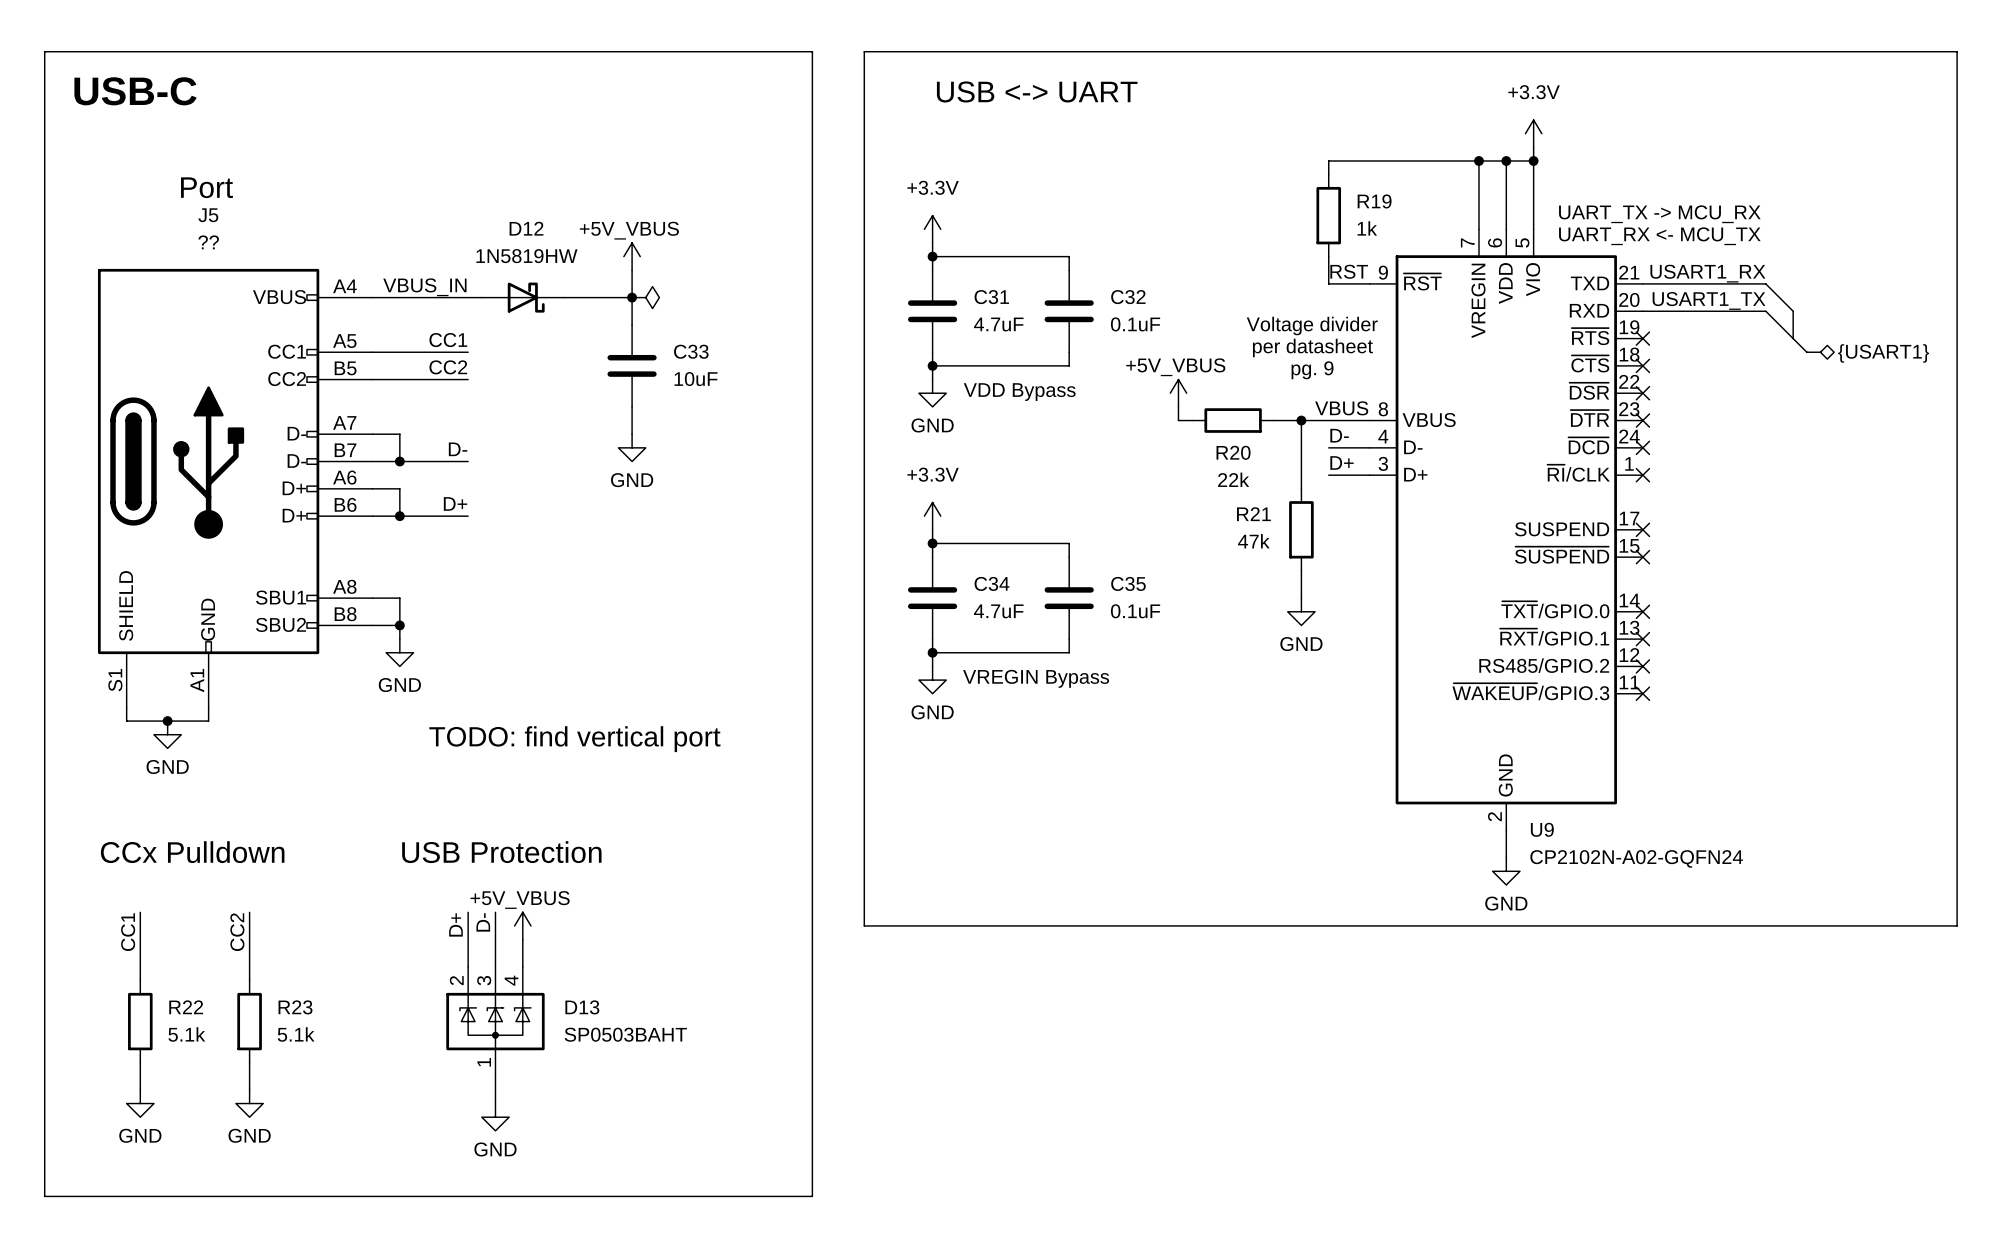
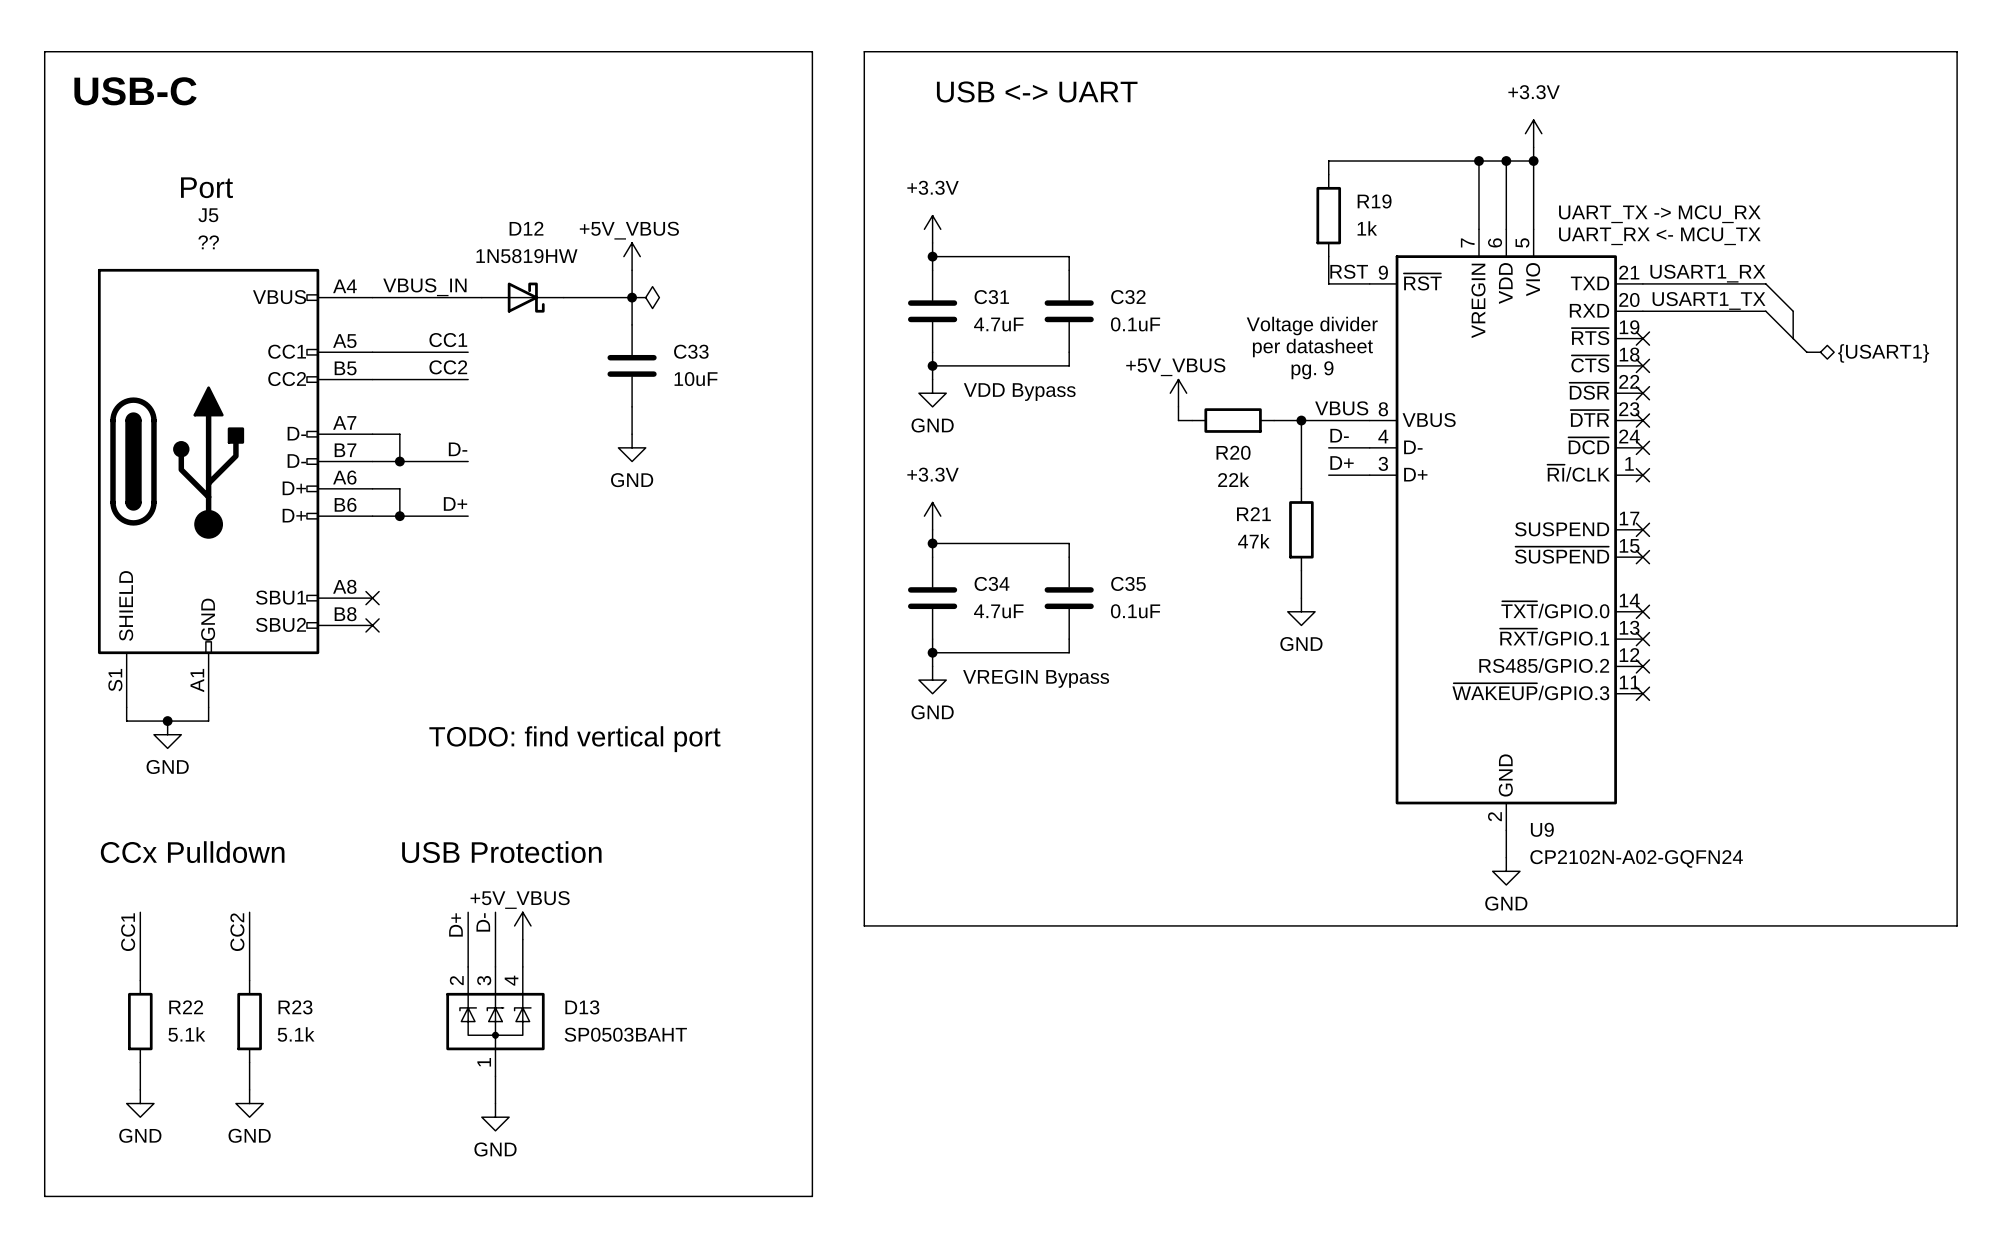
wire: (372, 598) (399, 598) (399, 639) -> none
no-connect mark: none -> (372, 598)
wire: (372, 625) (399, 625) -> none
no-connect mark: none -> (372, 625)
junction: (399, 625) -> none
power symbol: GND (399, 652) -> none

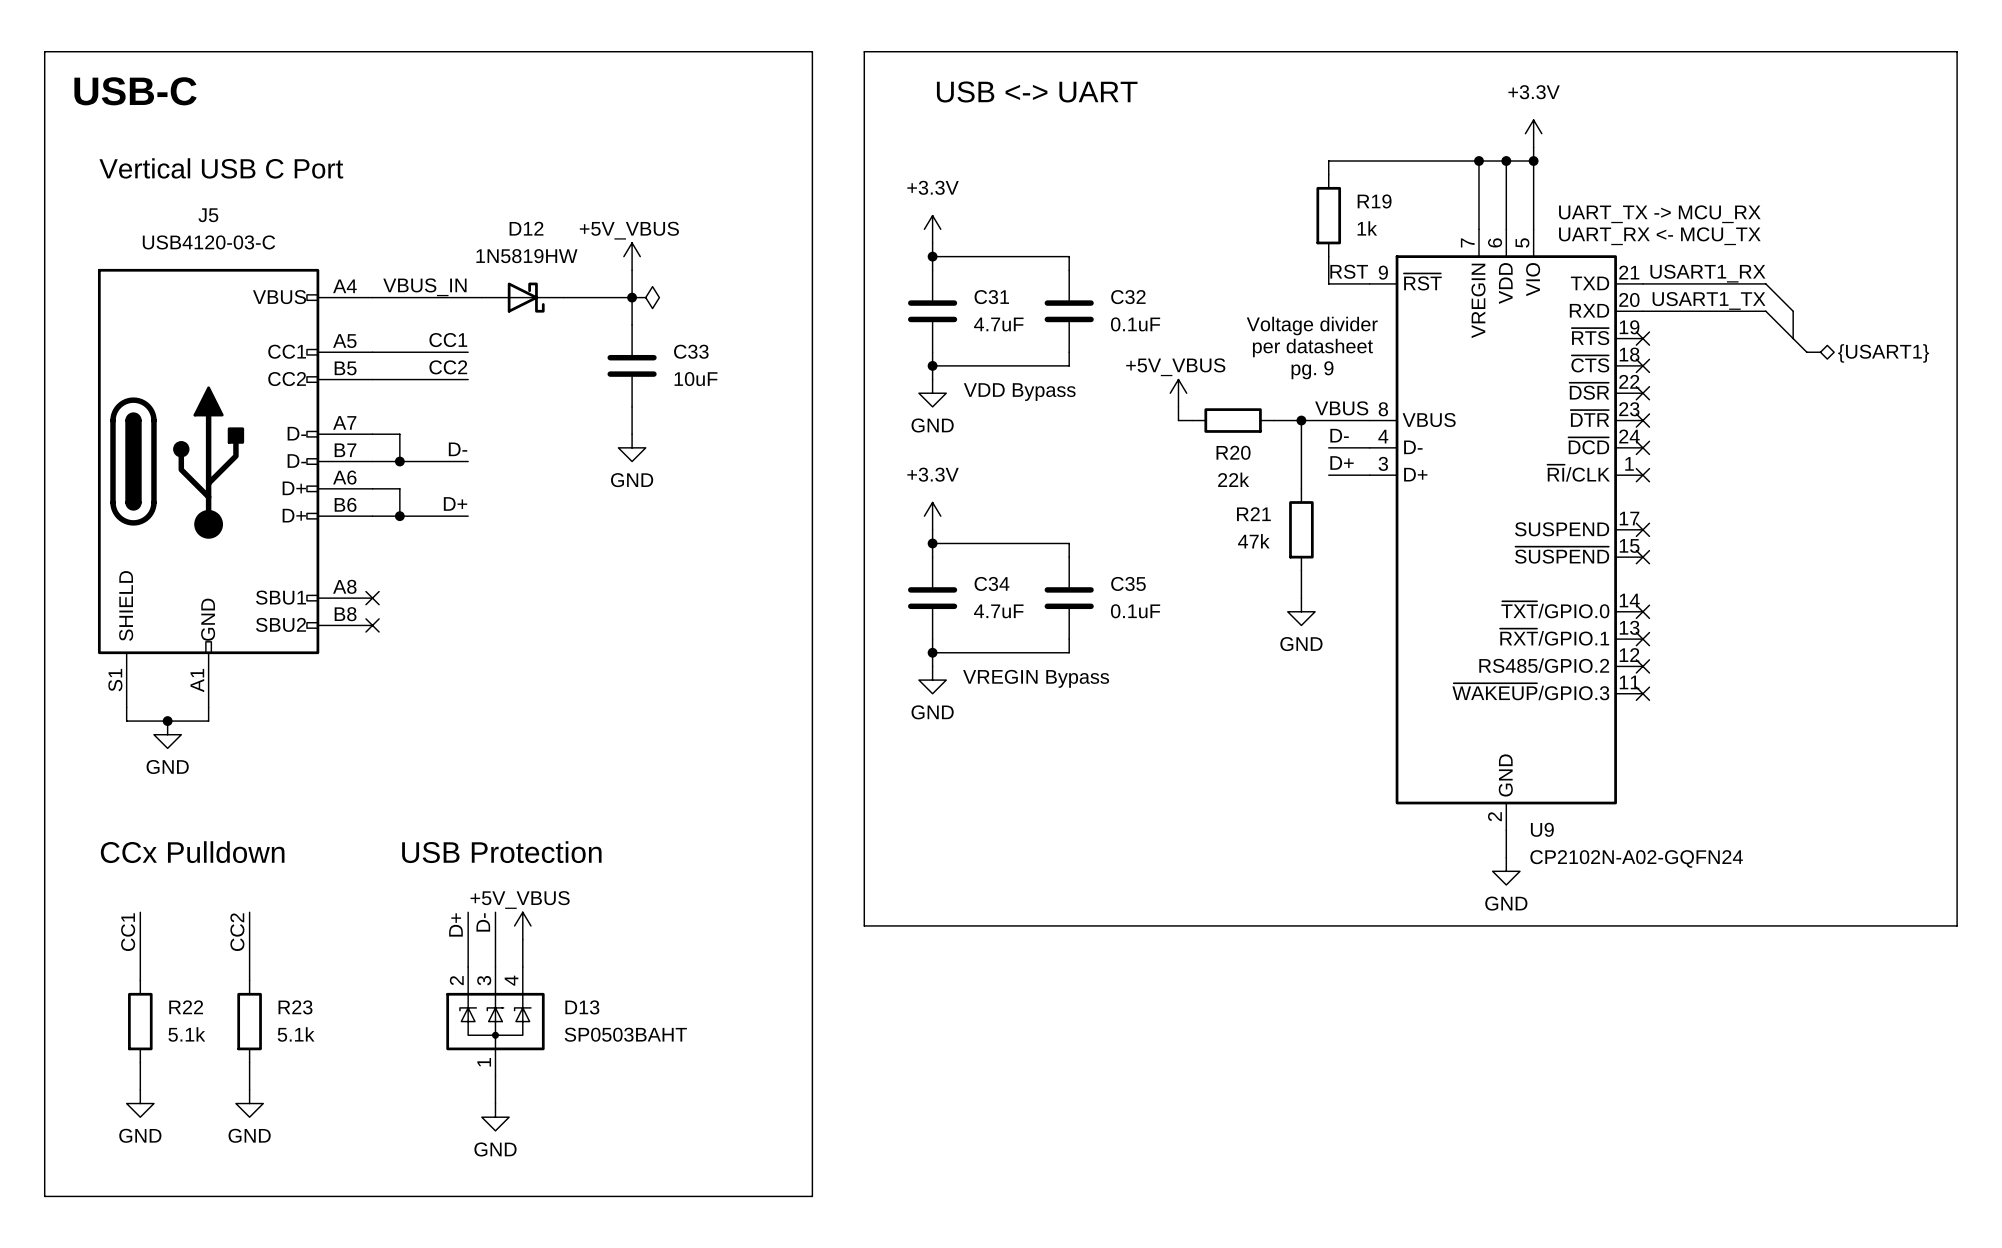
text: none -> Vertical USB C Port (221, 168)
text: Port (206, 187) -> none
J5 value: ?? (208, 242) -> USB4120-03-C (209, 242)
text: TODO: find vertical port (574, 739) -> none

